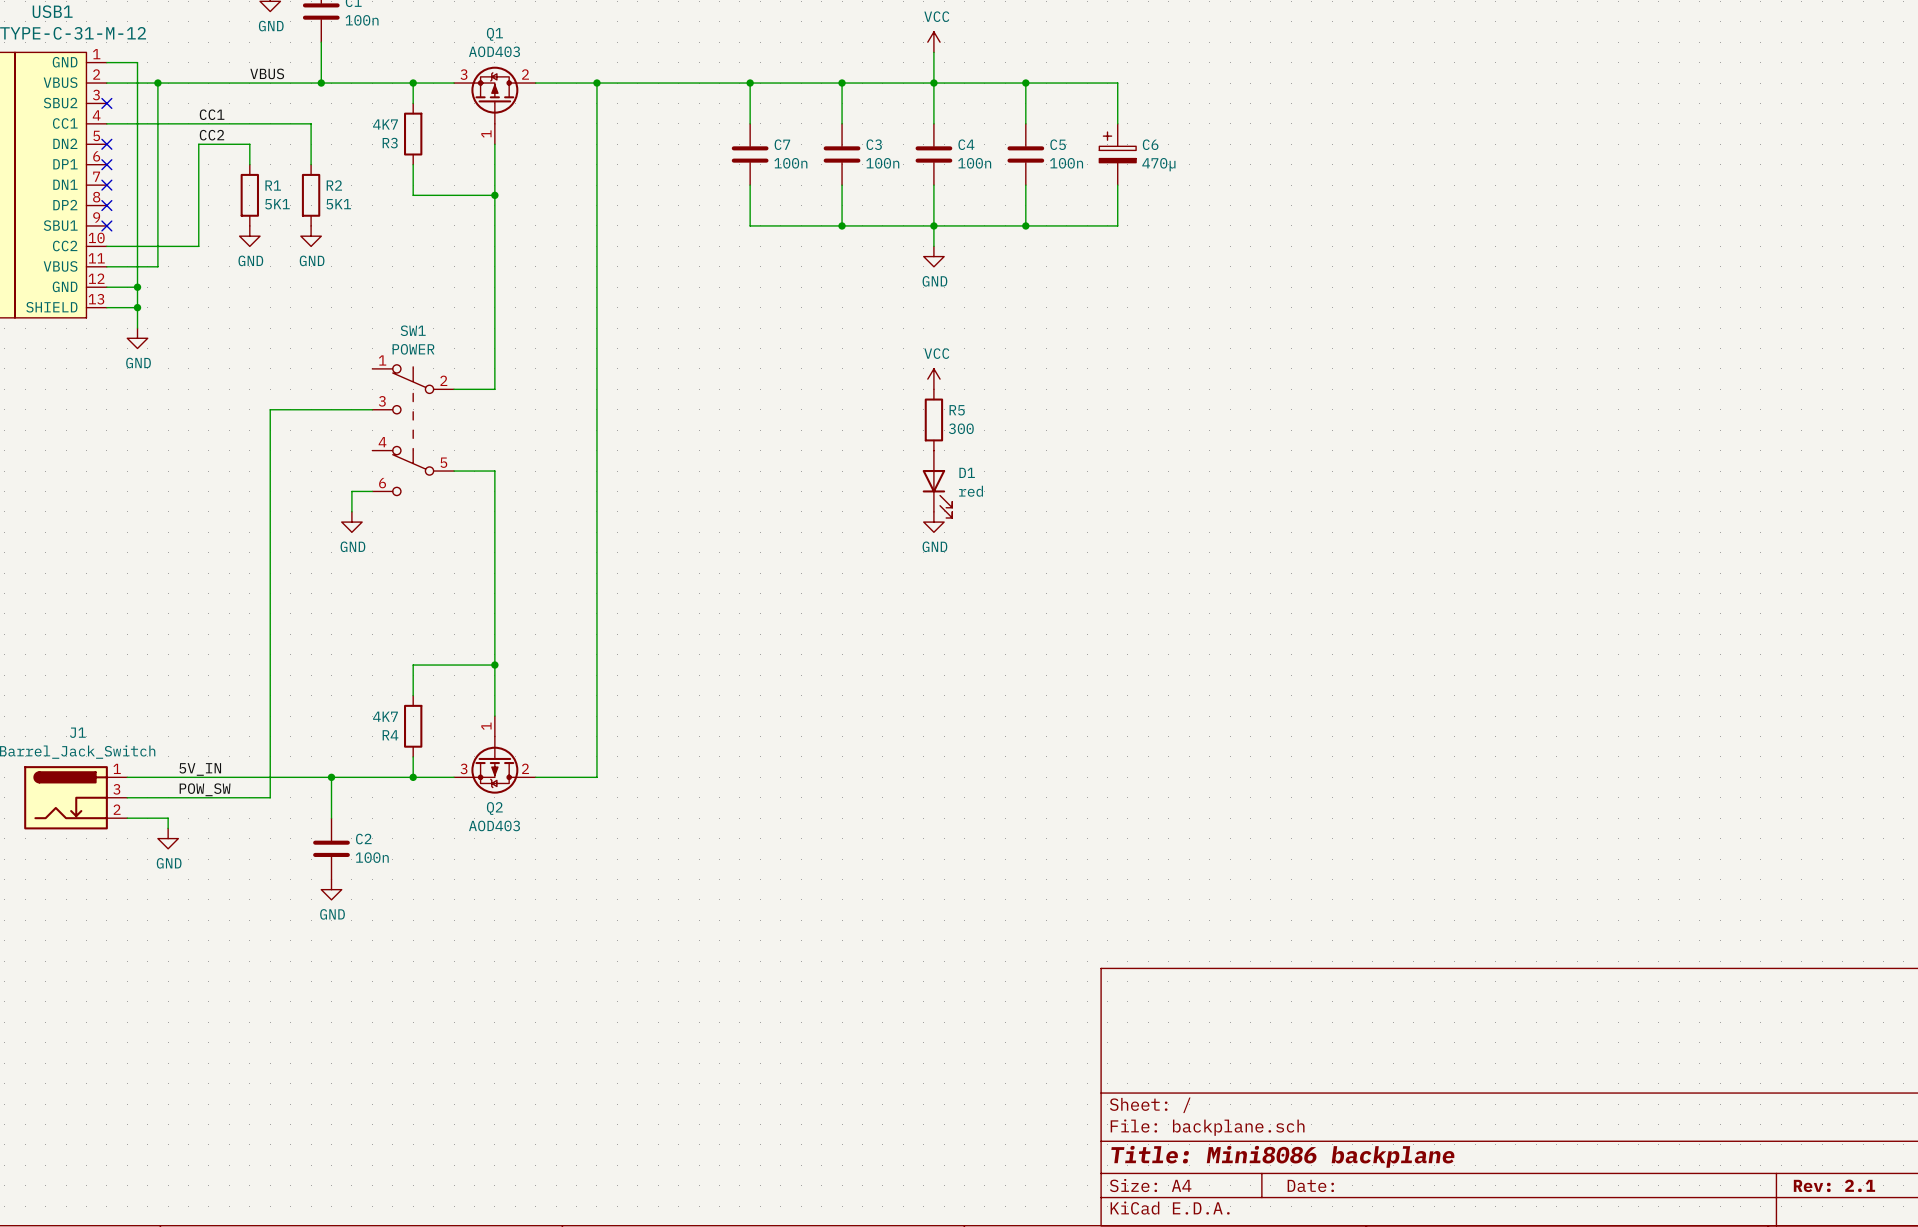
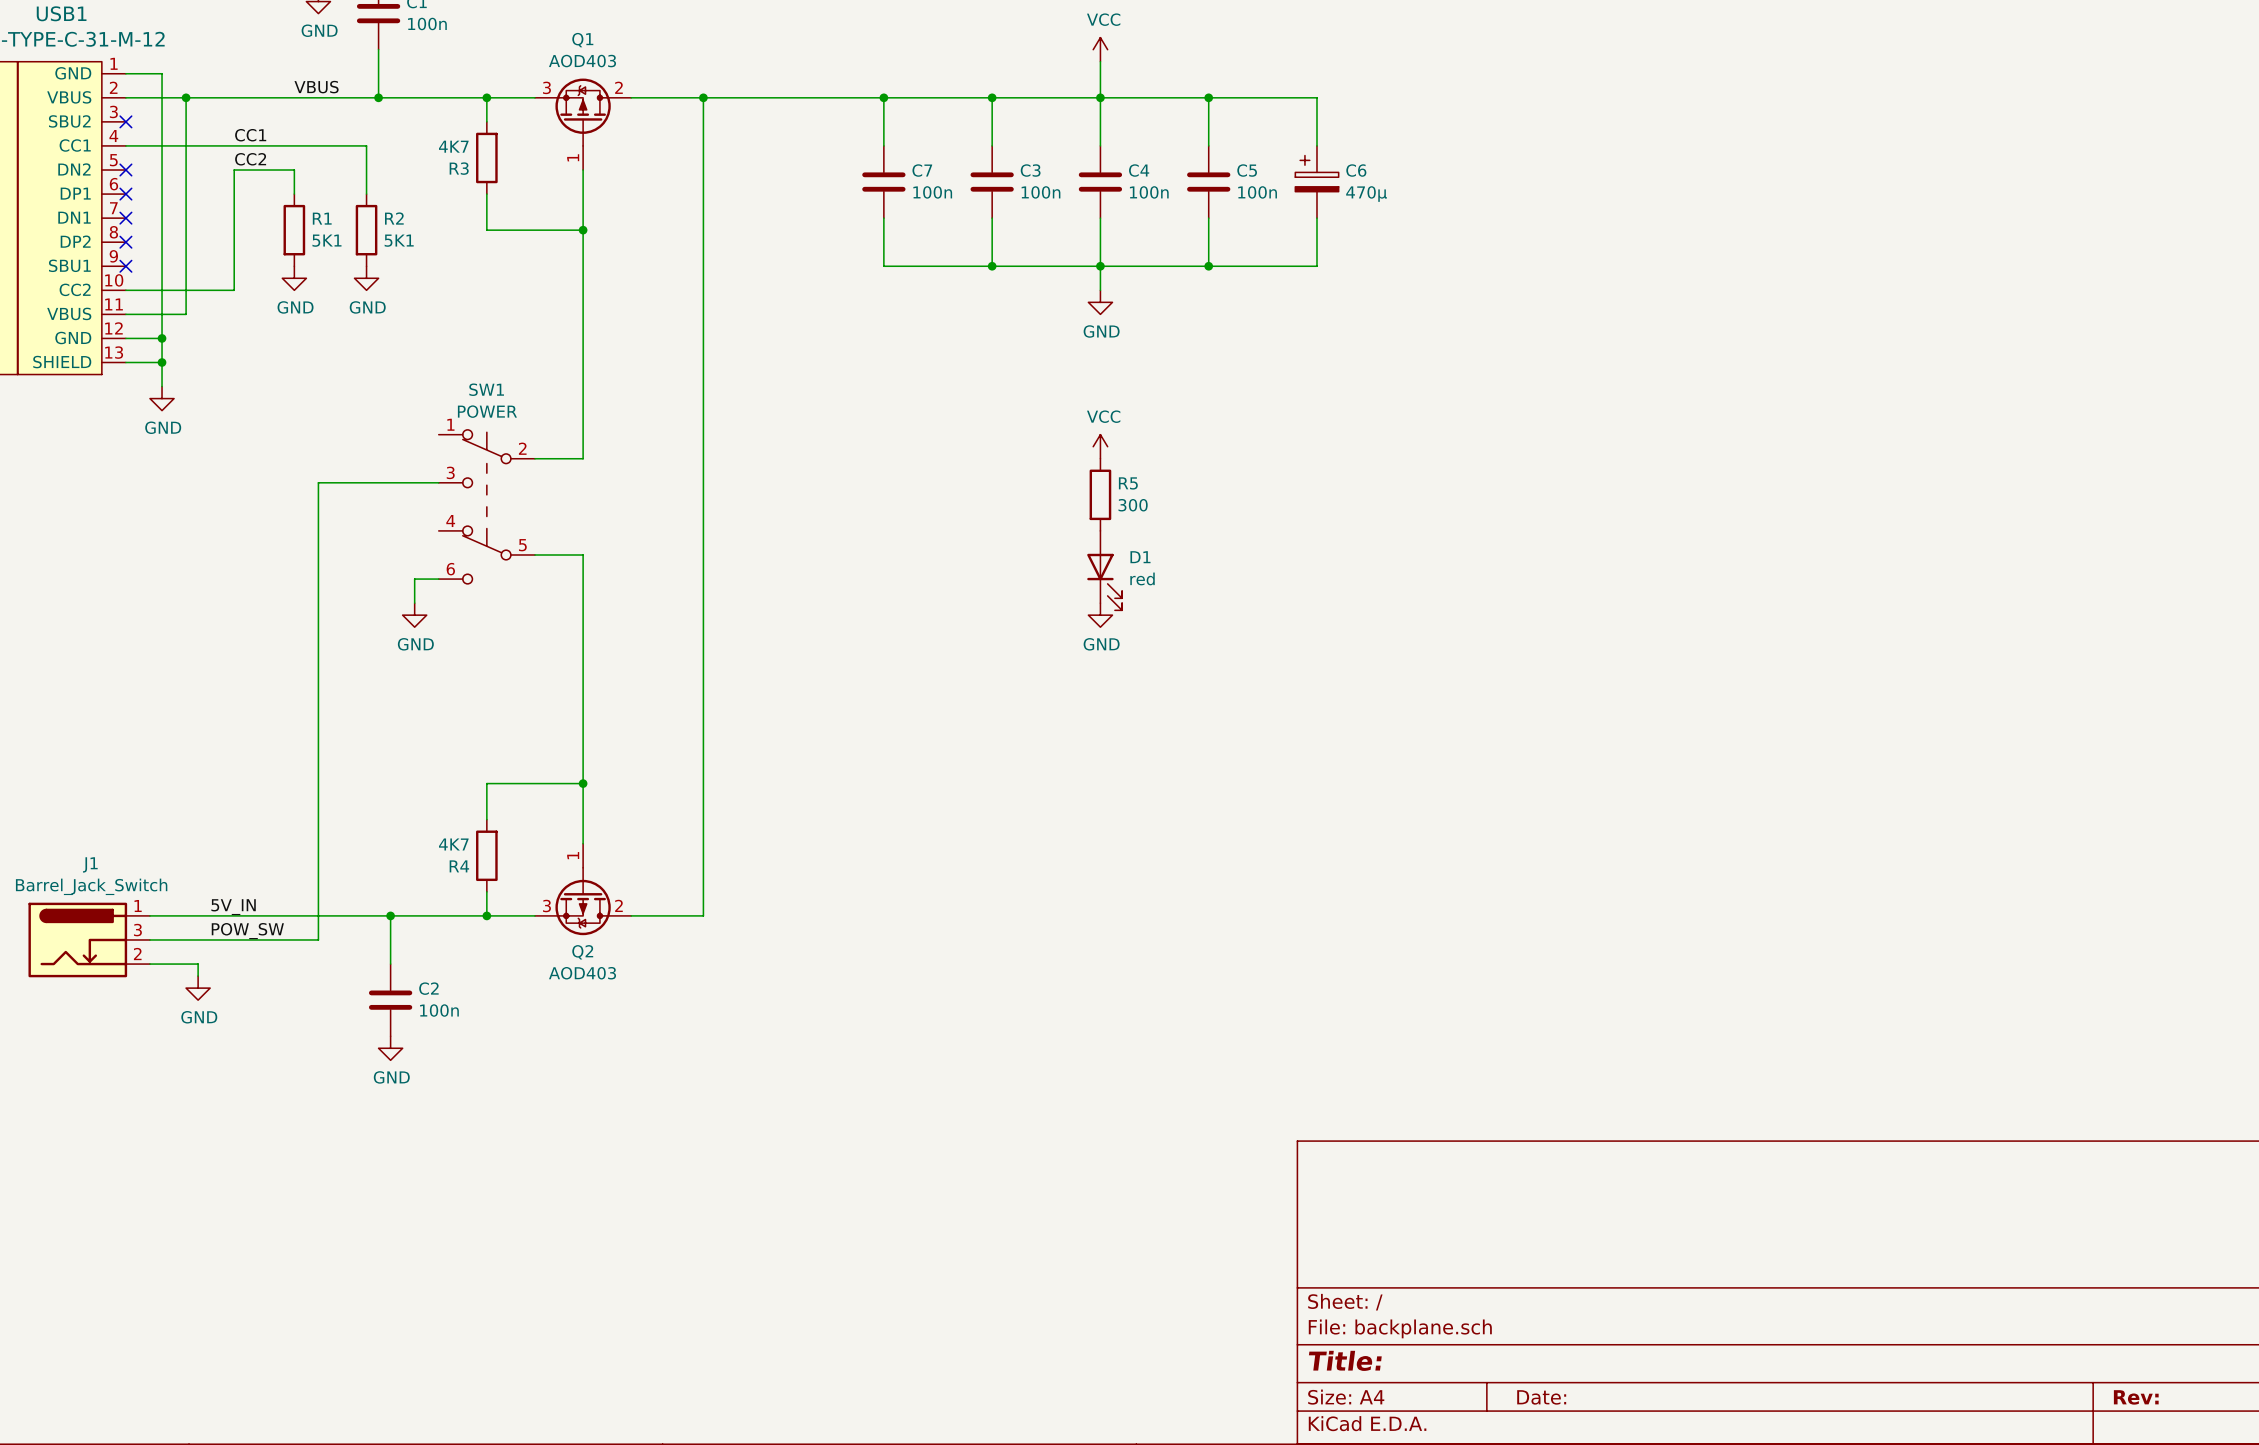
title block: Title: Mini8086 backplane (1282, 1156) -> Title: (1345, 1360)
title block: Rev: 2.1 (1834, 1185) -> Rev: (2136, 1397)

